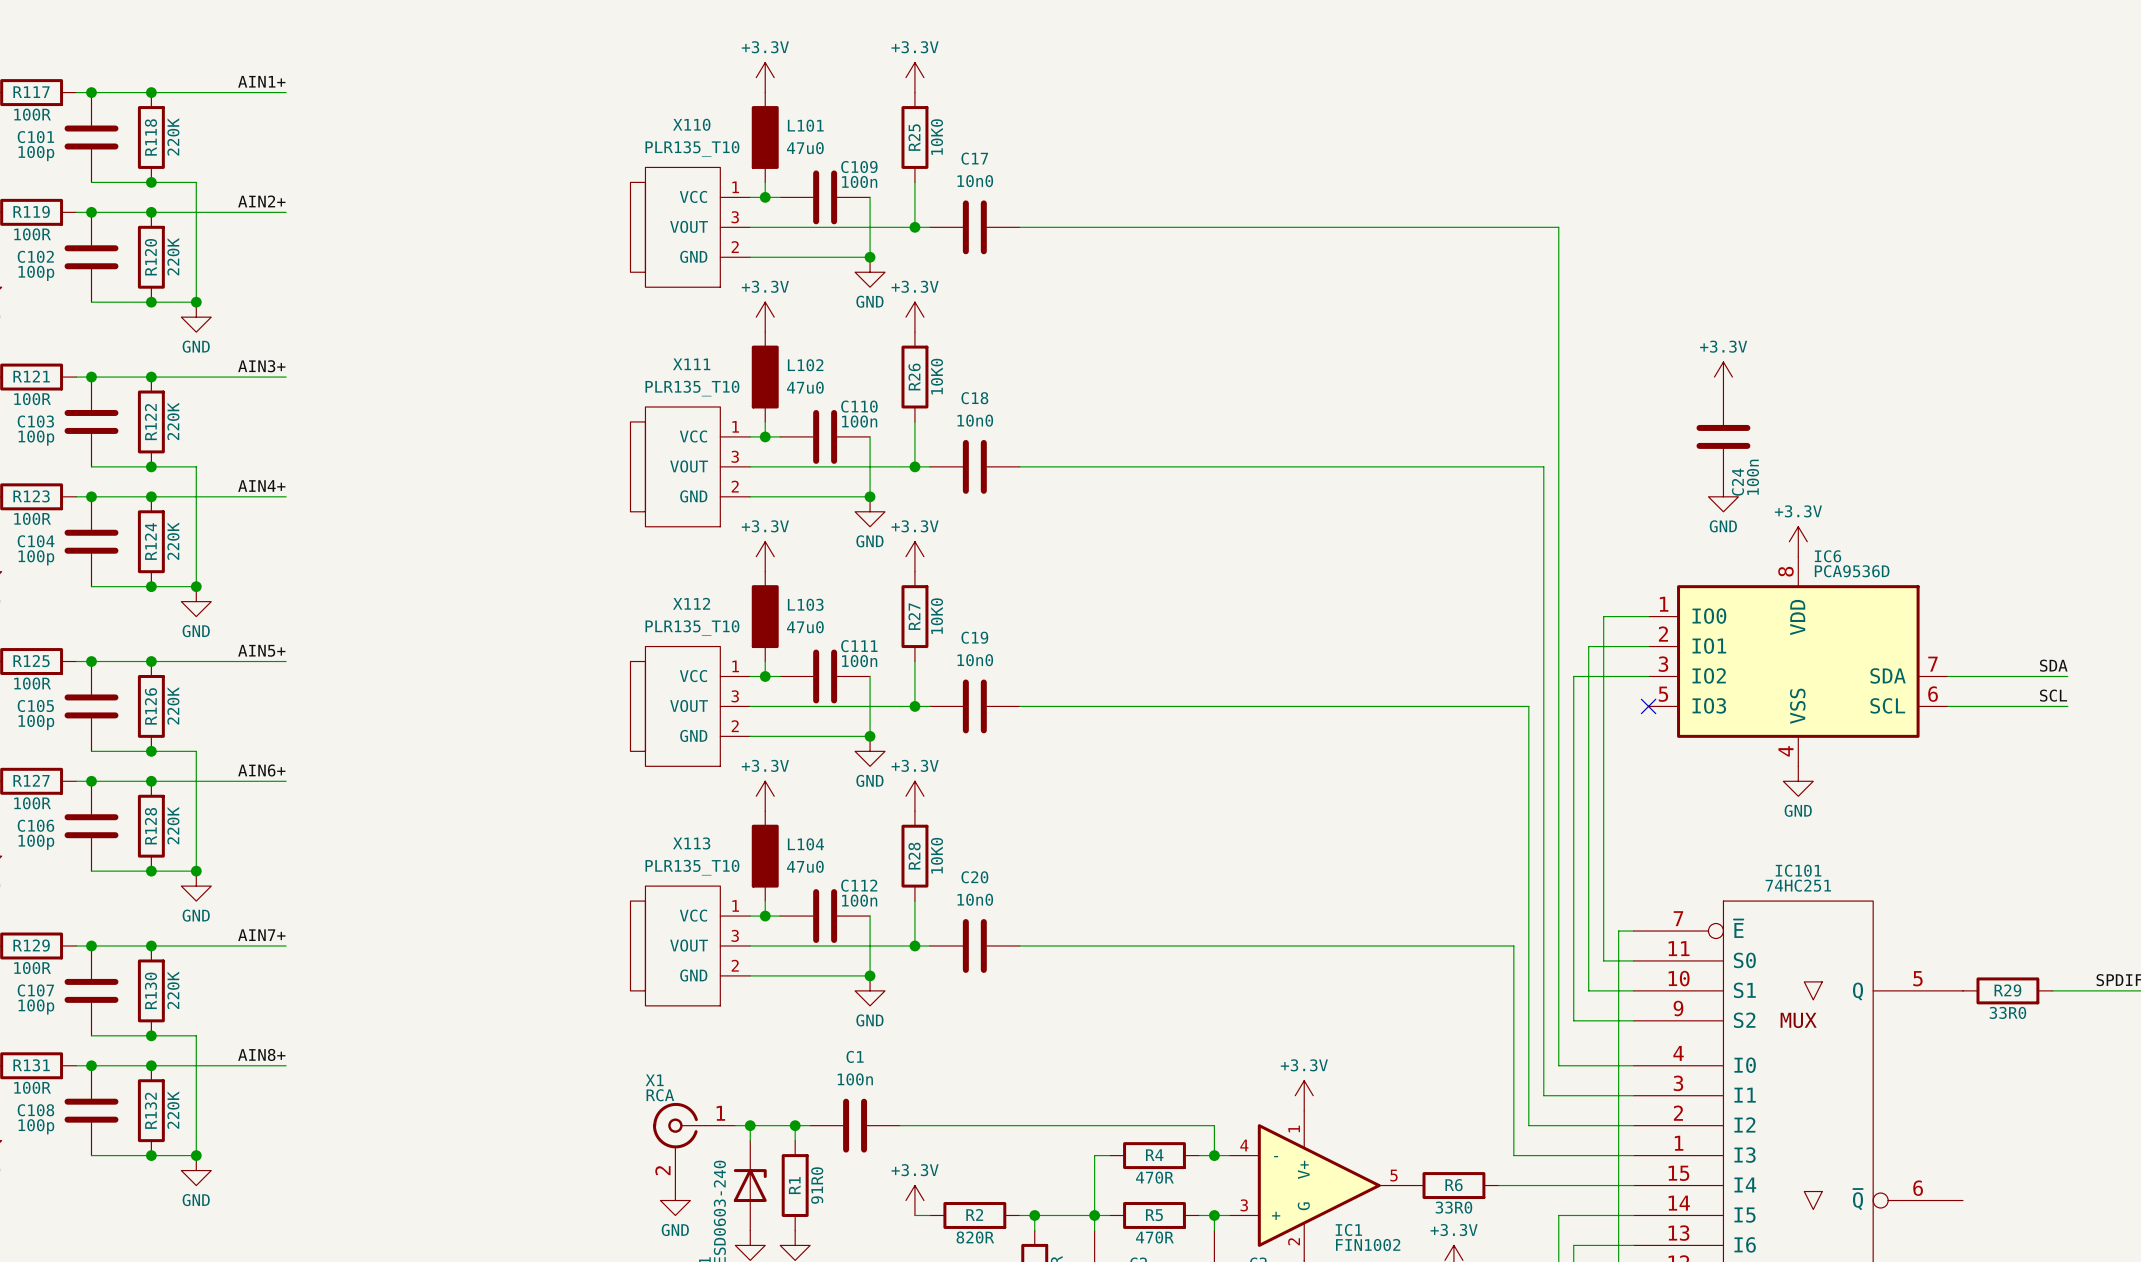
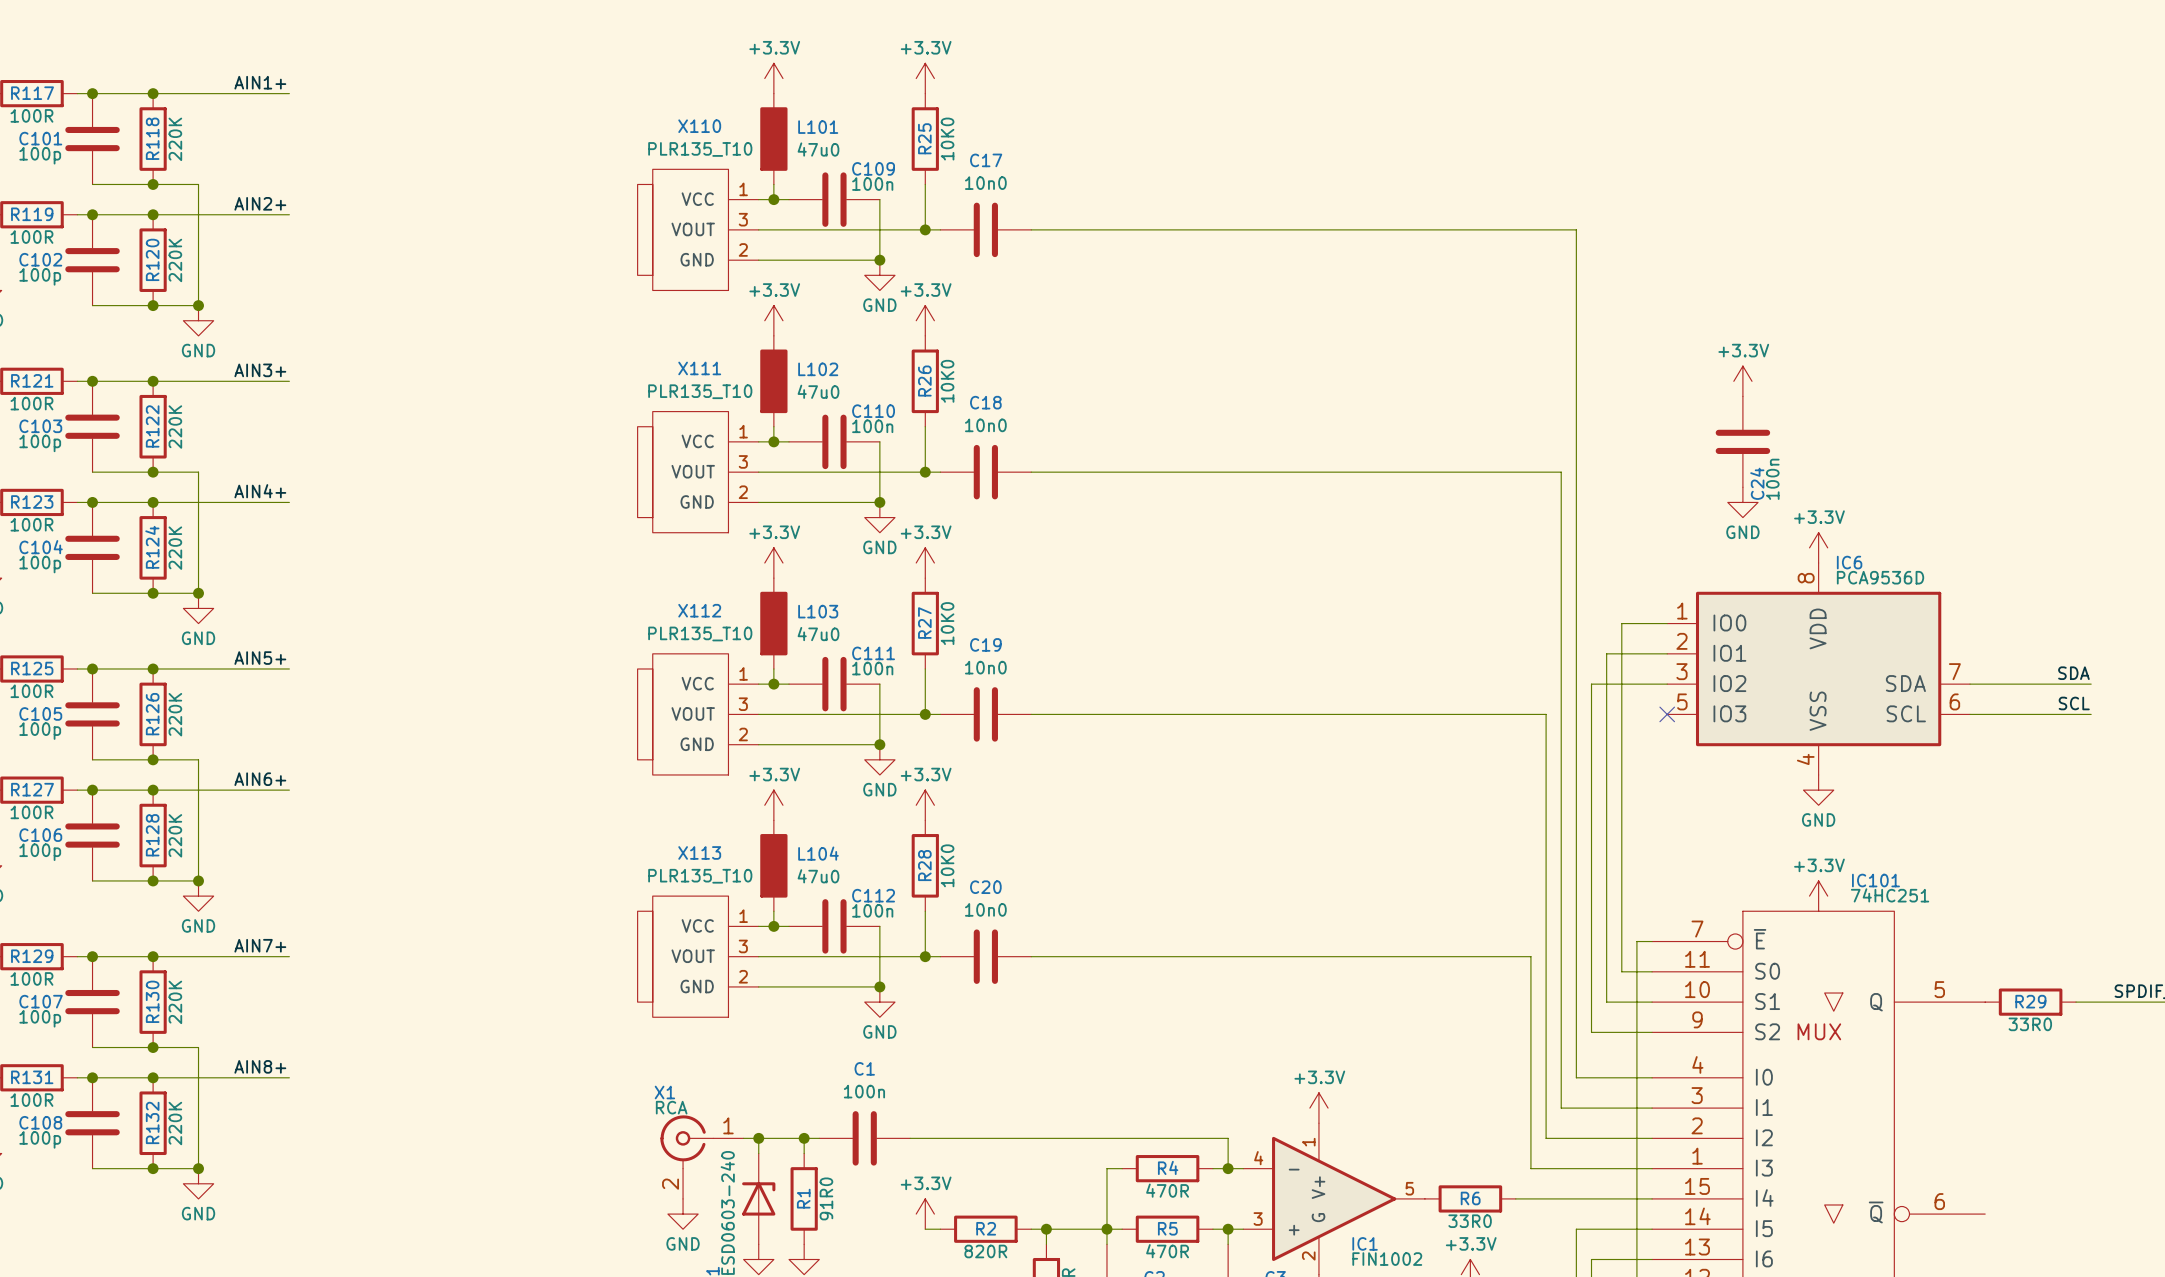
IC101 name position: IC101 (1798, 870) -> IC101 (1875, 880)
IC101 value position: 74HC251 (1798, 885) -> 74HC251 (1890, 895)
power symbol: none -> +3.3V (1818, 896)

